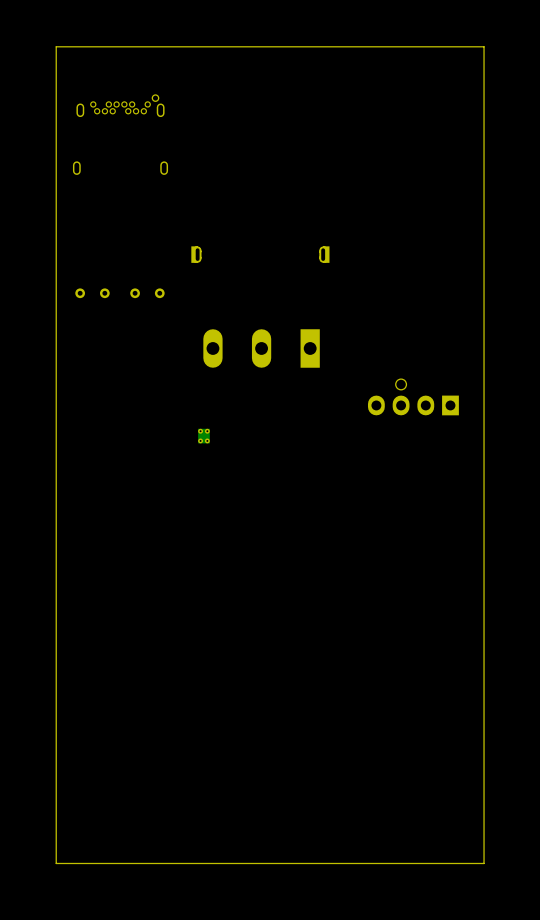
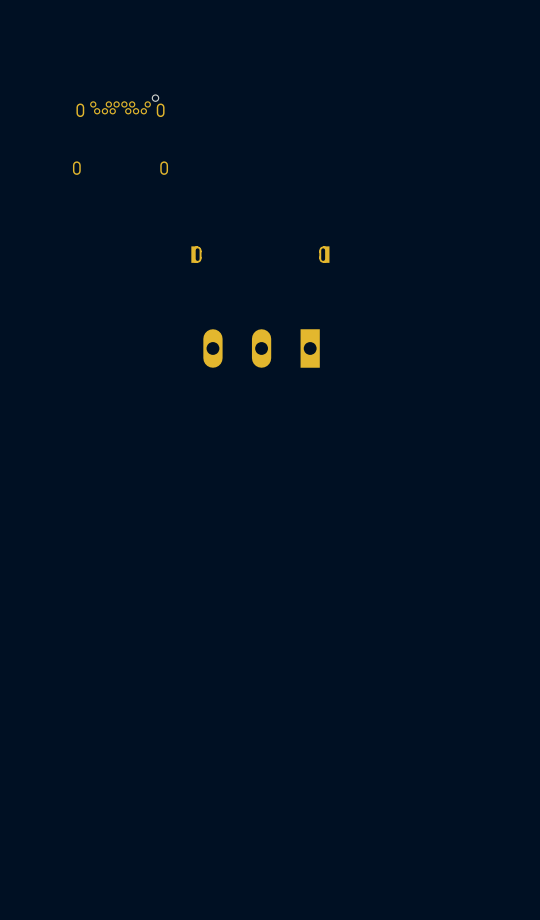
board edge: (484, 46) (56, 46) (56, 863) (484, 863) (484, 46) -> none
part: (92, 293) -> none
part: (147, 293) -> none
part: (413, 397) -> none
part: (203, 436) -> none

